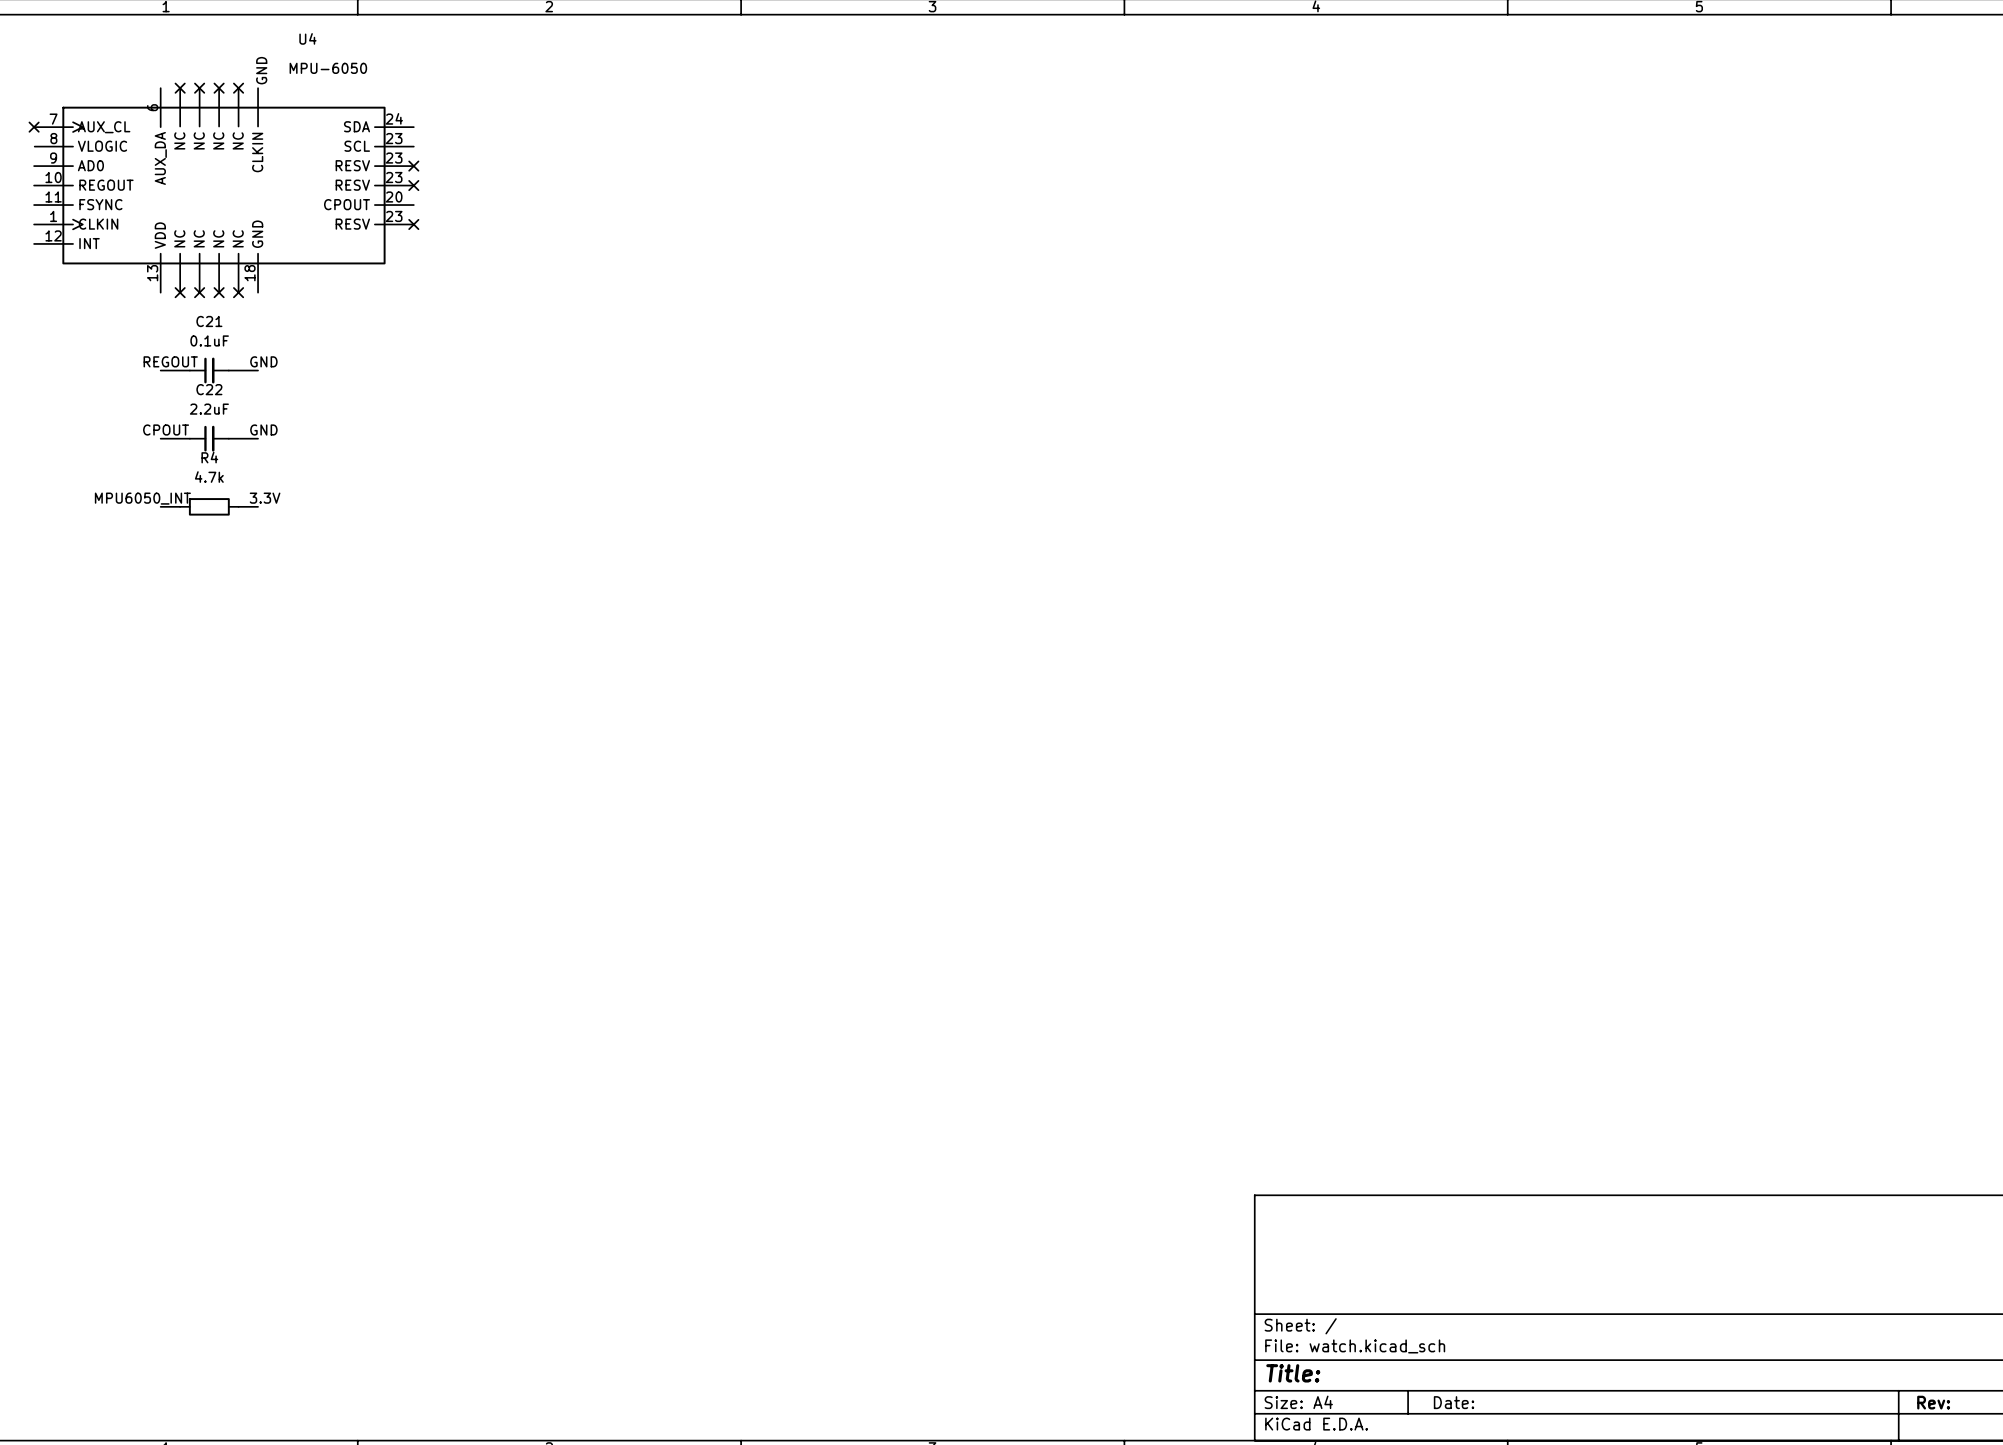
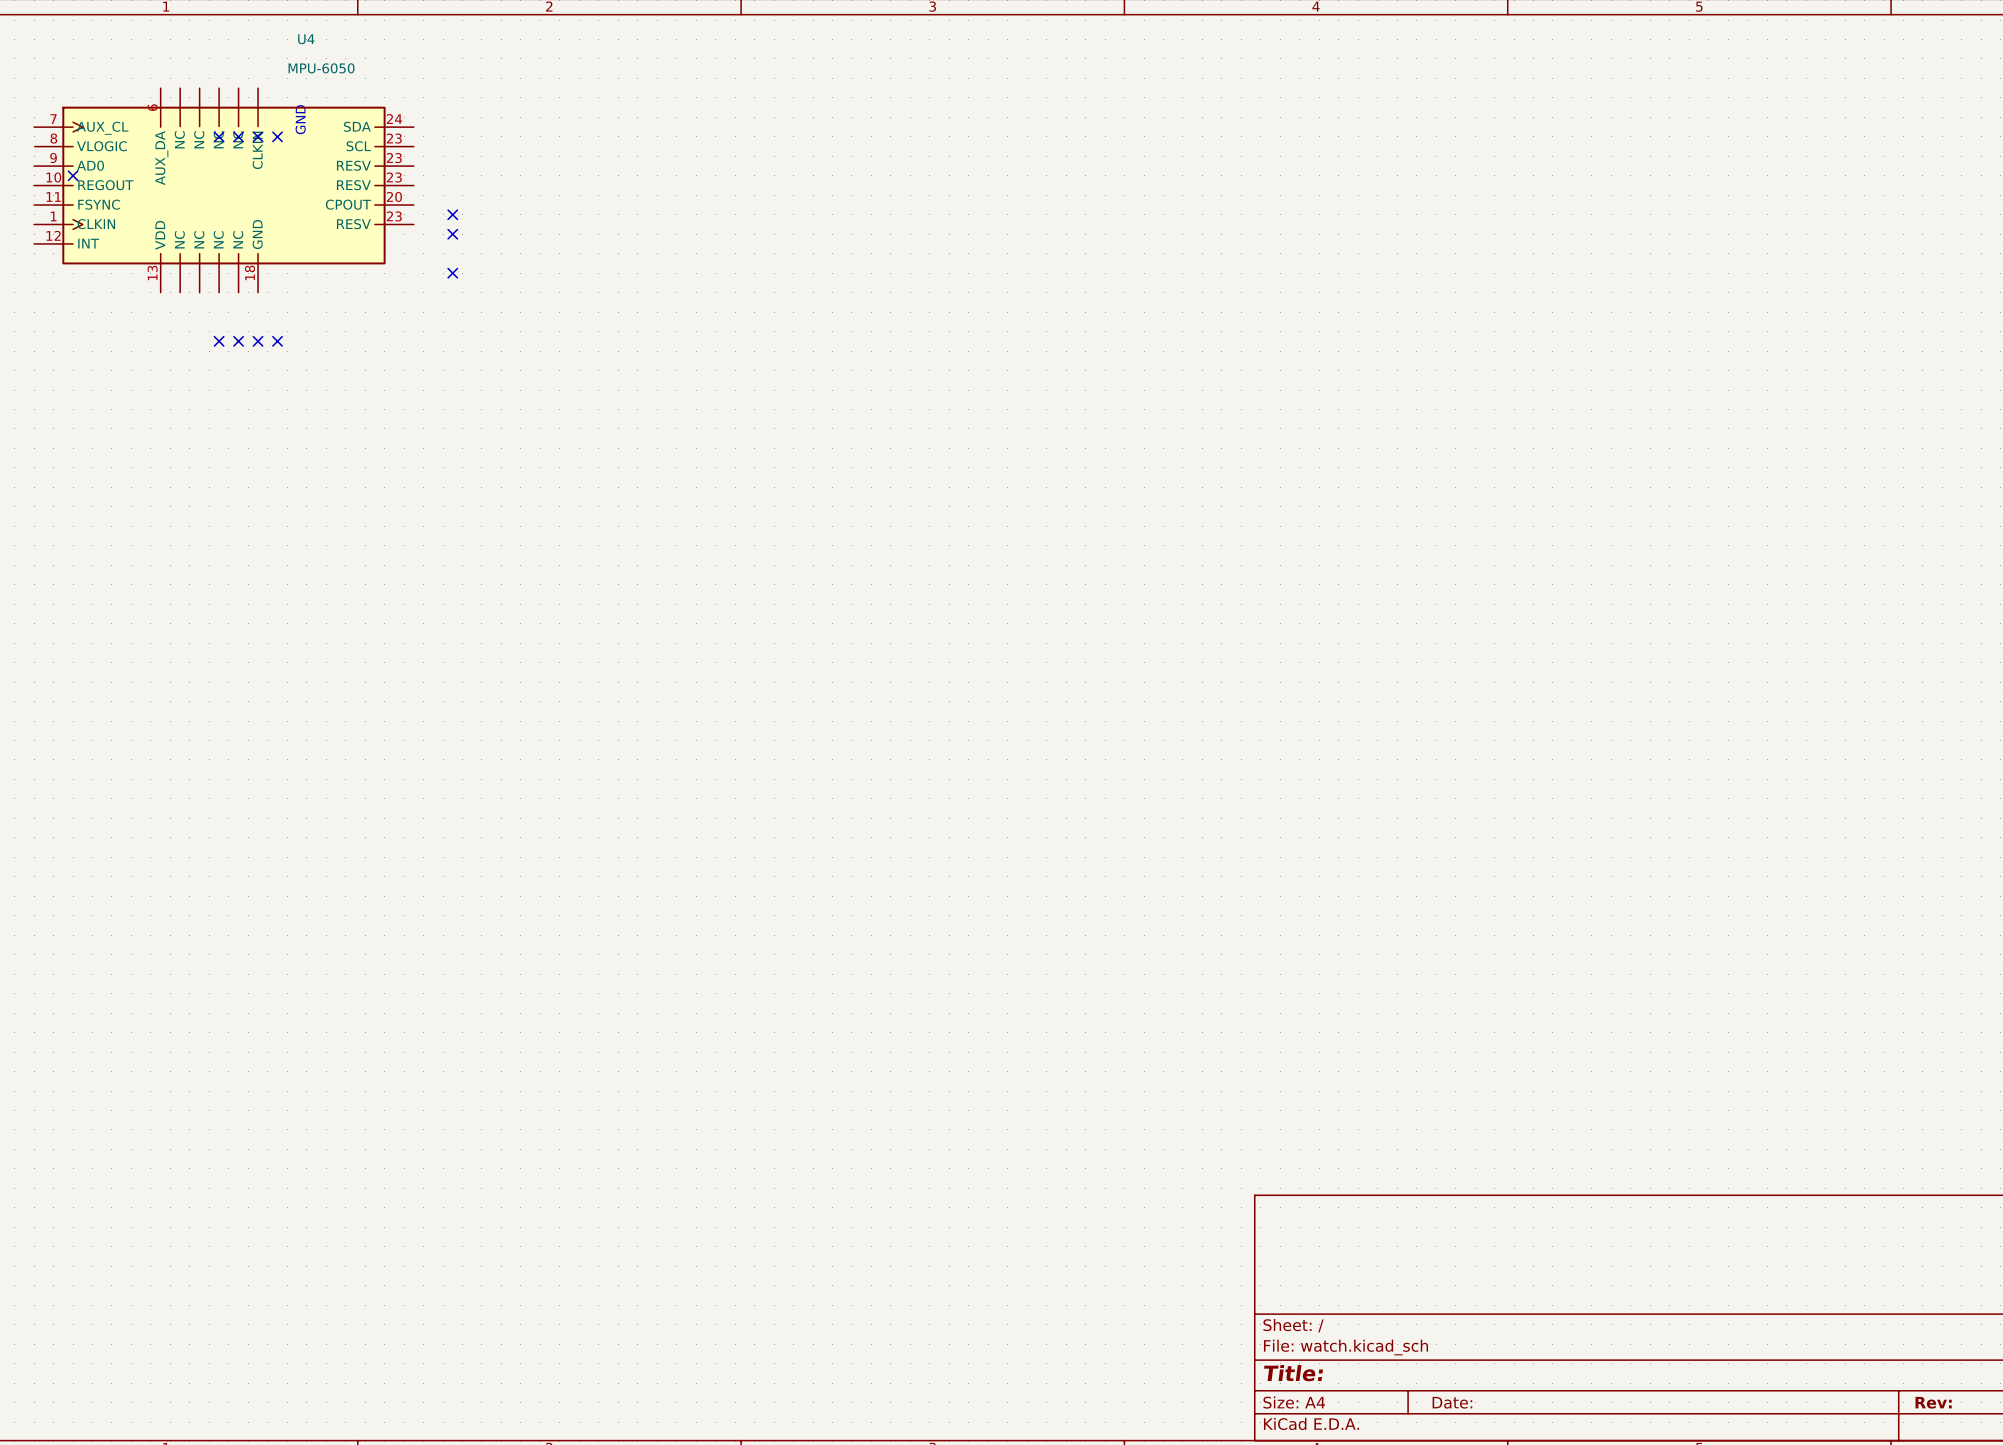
text position: GND (261, 70) -> GND (300, 119)
no-connect mark: (180, 88) -> none
no-connect mark: (199, 88) -> none
no-connect mark: (219, 88) -> none
no-connect mark: (238, 88) -> none
no-connect mark: (34, 127) -> none
no-connect mark: none -> (219, 136)
no-connect mark: none -> (238, 136)
no-connect mark: none -> (258, 136)
no-connect mark: none -> (277, 136)
no-connect mark: (413, 166) -> none
no-connect mark: none -> (73, 175)
no-connect mark: (413, 185) -> none
no-connect mark: none -> (452, 214)
no-connect mark: (413, 224) -> none
no-connect mark: none -> (452, 234)
no-connect mark: none -> (452, 273)
no-connect mark: (180, 292) -> none
no-connect mark: (199, 292) -> none
no-connect mark: (219, 292) -> none
no-connect mark: (238, 292) -> none
no-connect mark: none -> (219, 341)
no-connect mark: none -> (238, 341)
no-connect mark: none -> (258, 341)
no-connect mark: none -> (277, 341)
label: REGOUT (170, 361) -> none
label: GND (263, 361) -> none
wire: (160, 370) (189, 370) -> none
C21: (209, 370) -> none
wire: (228, 370) (258, 370) -> none
label: CPOUT (166, 430) -> none
label: GND (263, 430) -> none
wire: (160, 438) (189, 438) -> none
C22: (209, 438) -> none
wire: (228, 438) (258, 438) -> none
label: MPU6050_INT (142, 498) -> none
label: 3.3V (265, 498) -> none
wire: (160, 506) (180, 506) -> none
R4: (209, 506) -> none
wire: (238, 506) (258, 506) -> none

